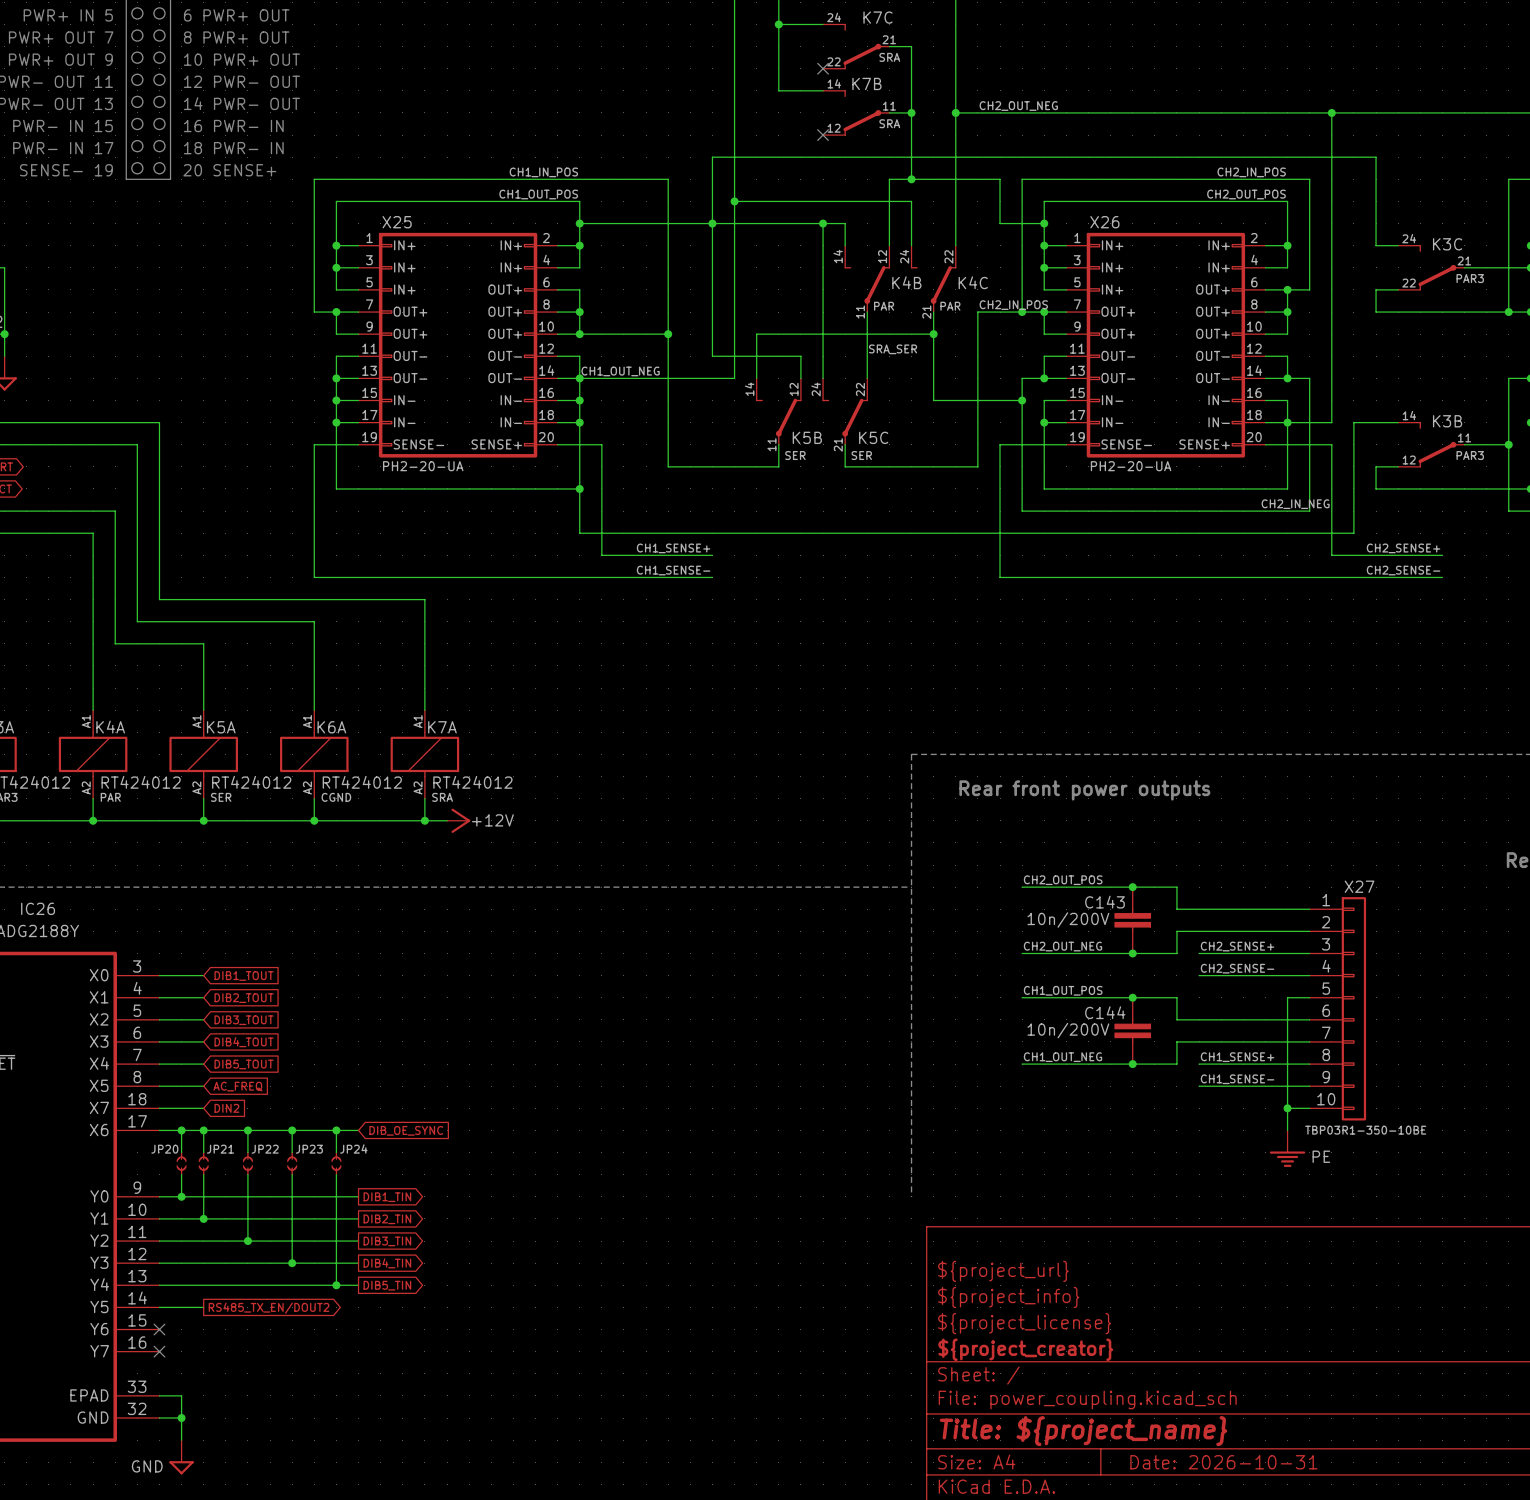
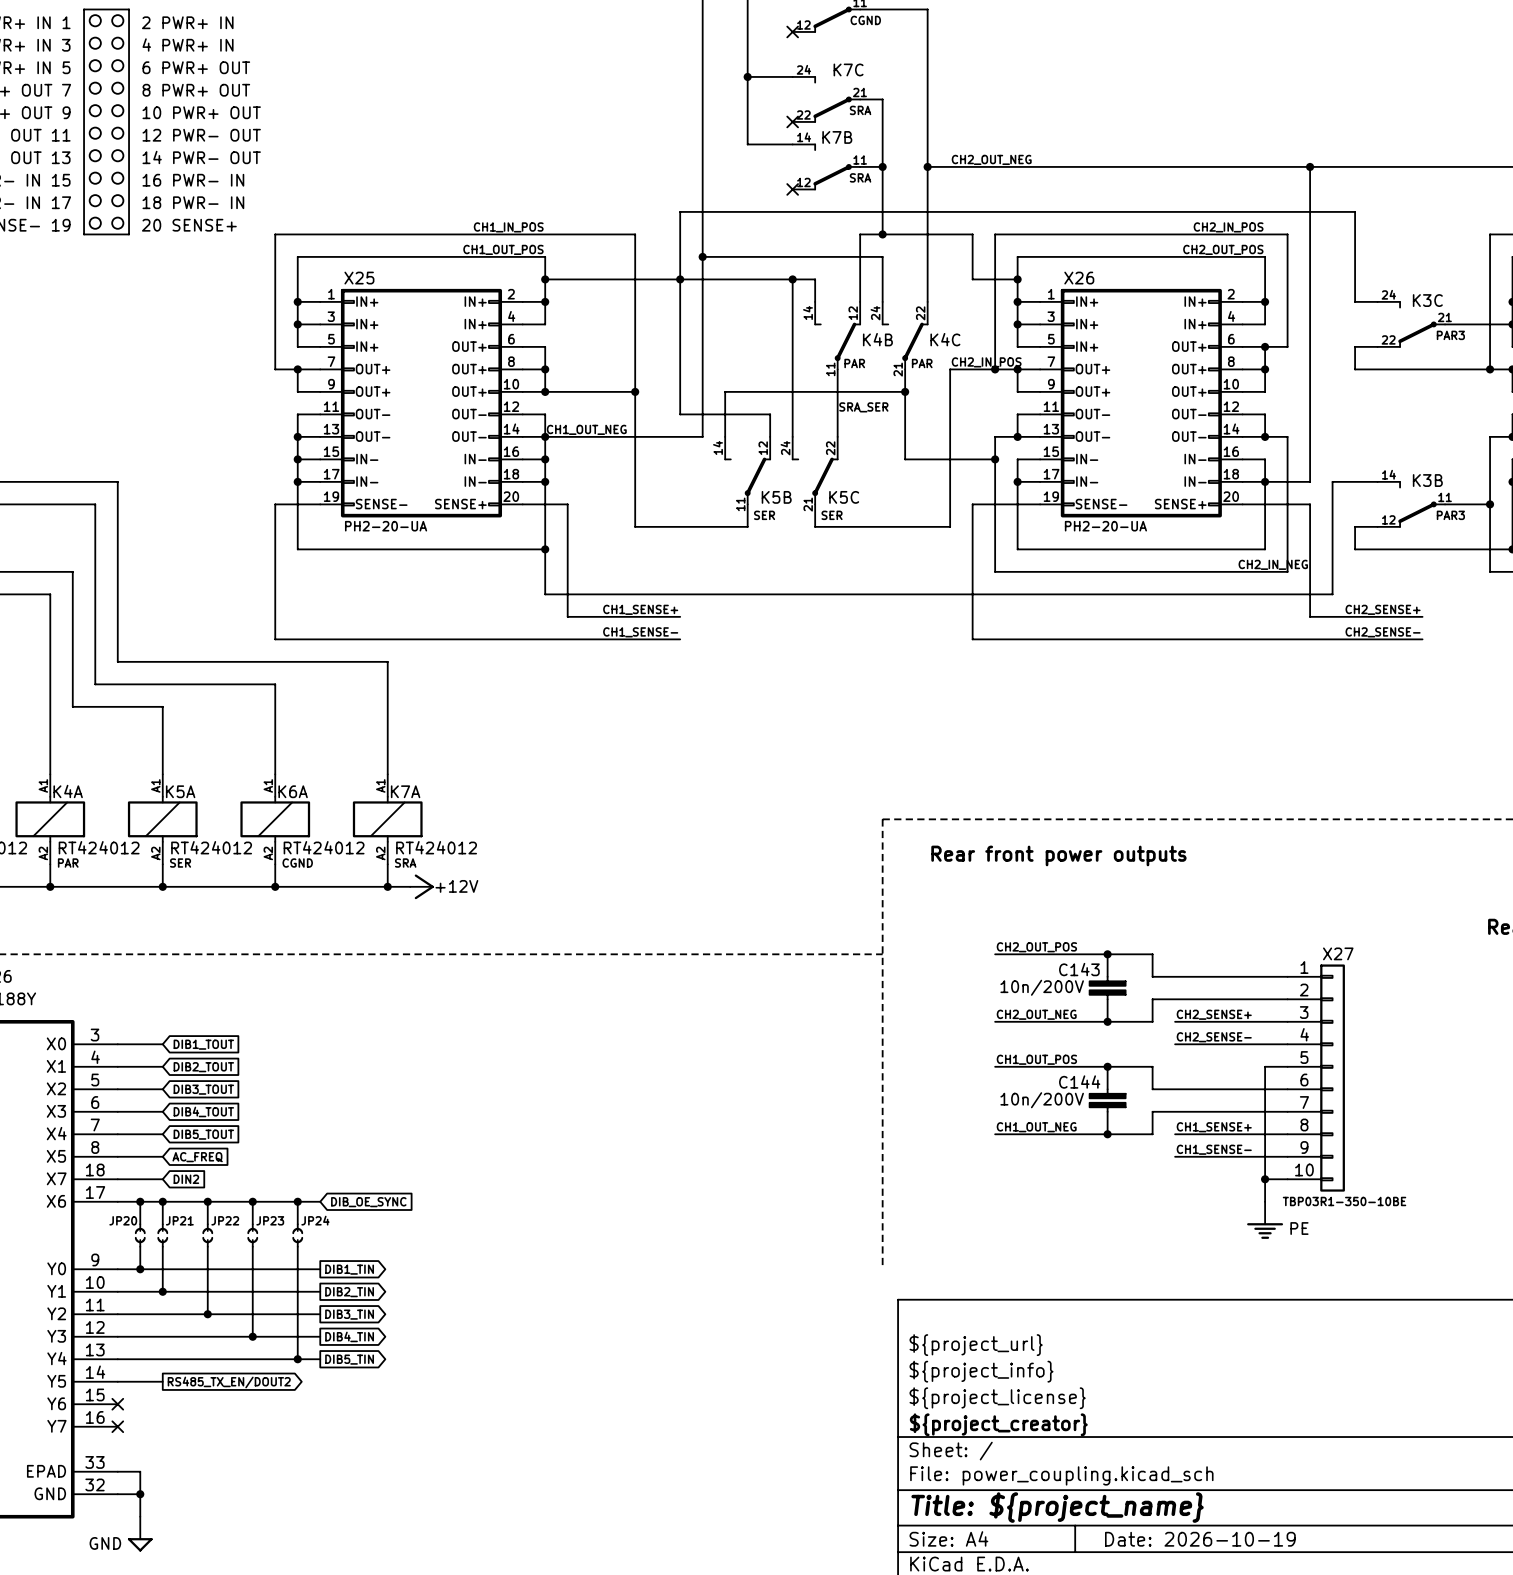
title block: Date: 2026-10-31 (1223, 1462) -> Date: 2026-10-19 (1200, 1539)

